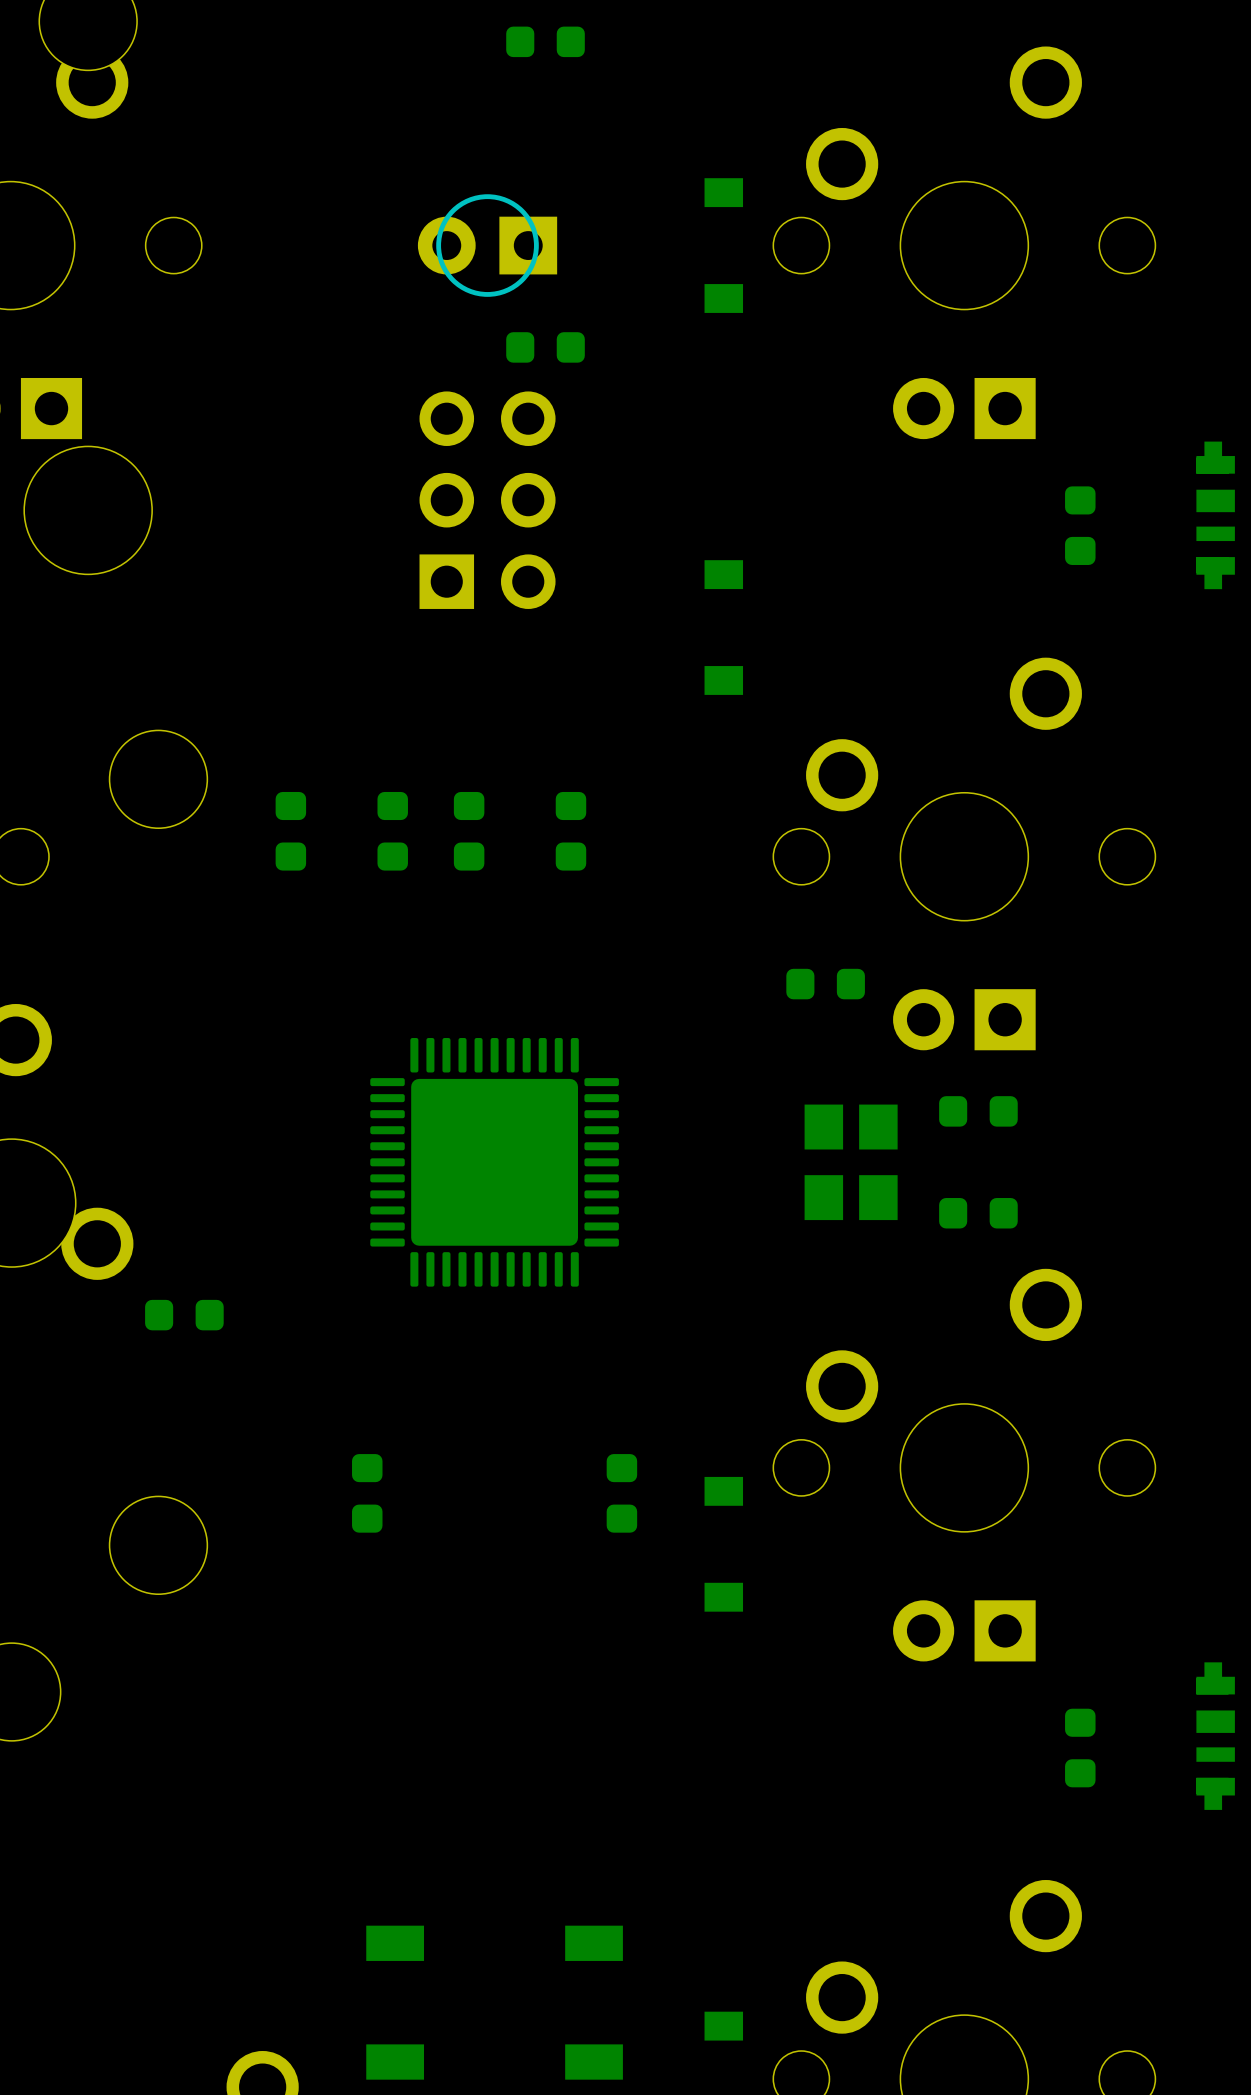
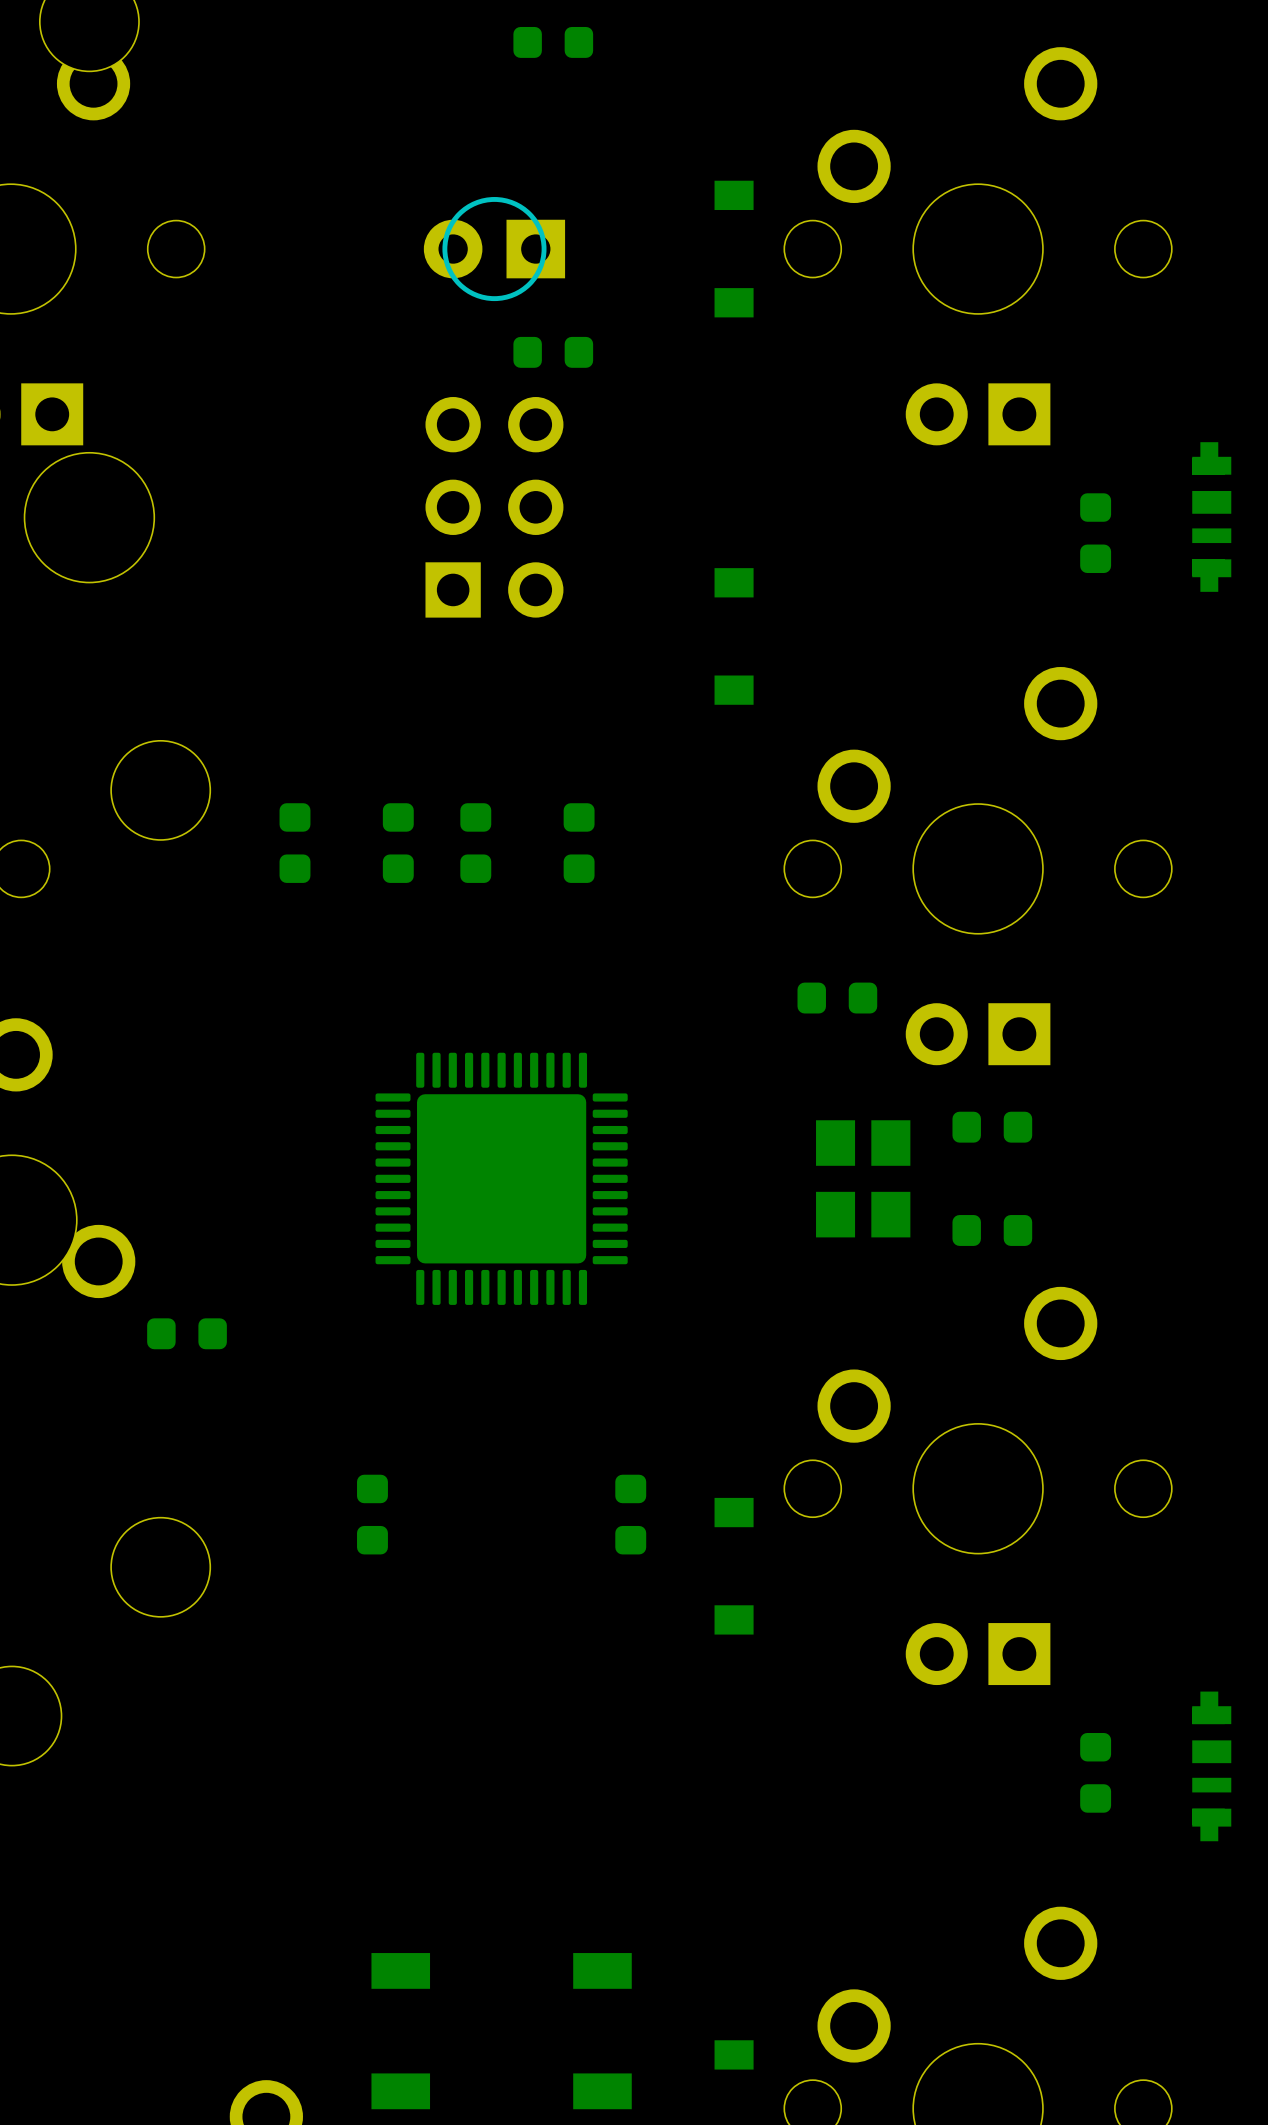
part position: (1215, 515) -> (1211, 517)
part position: (1215, 1736) -> (1211, 1766)

